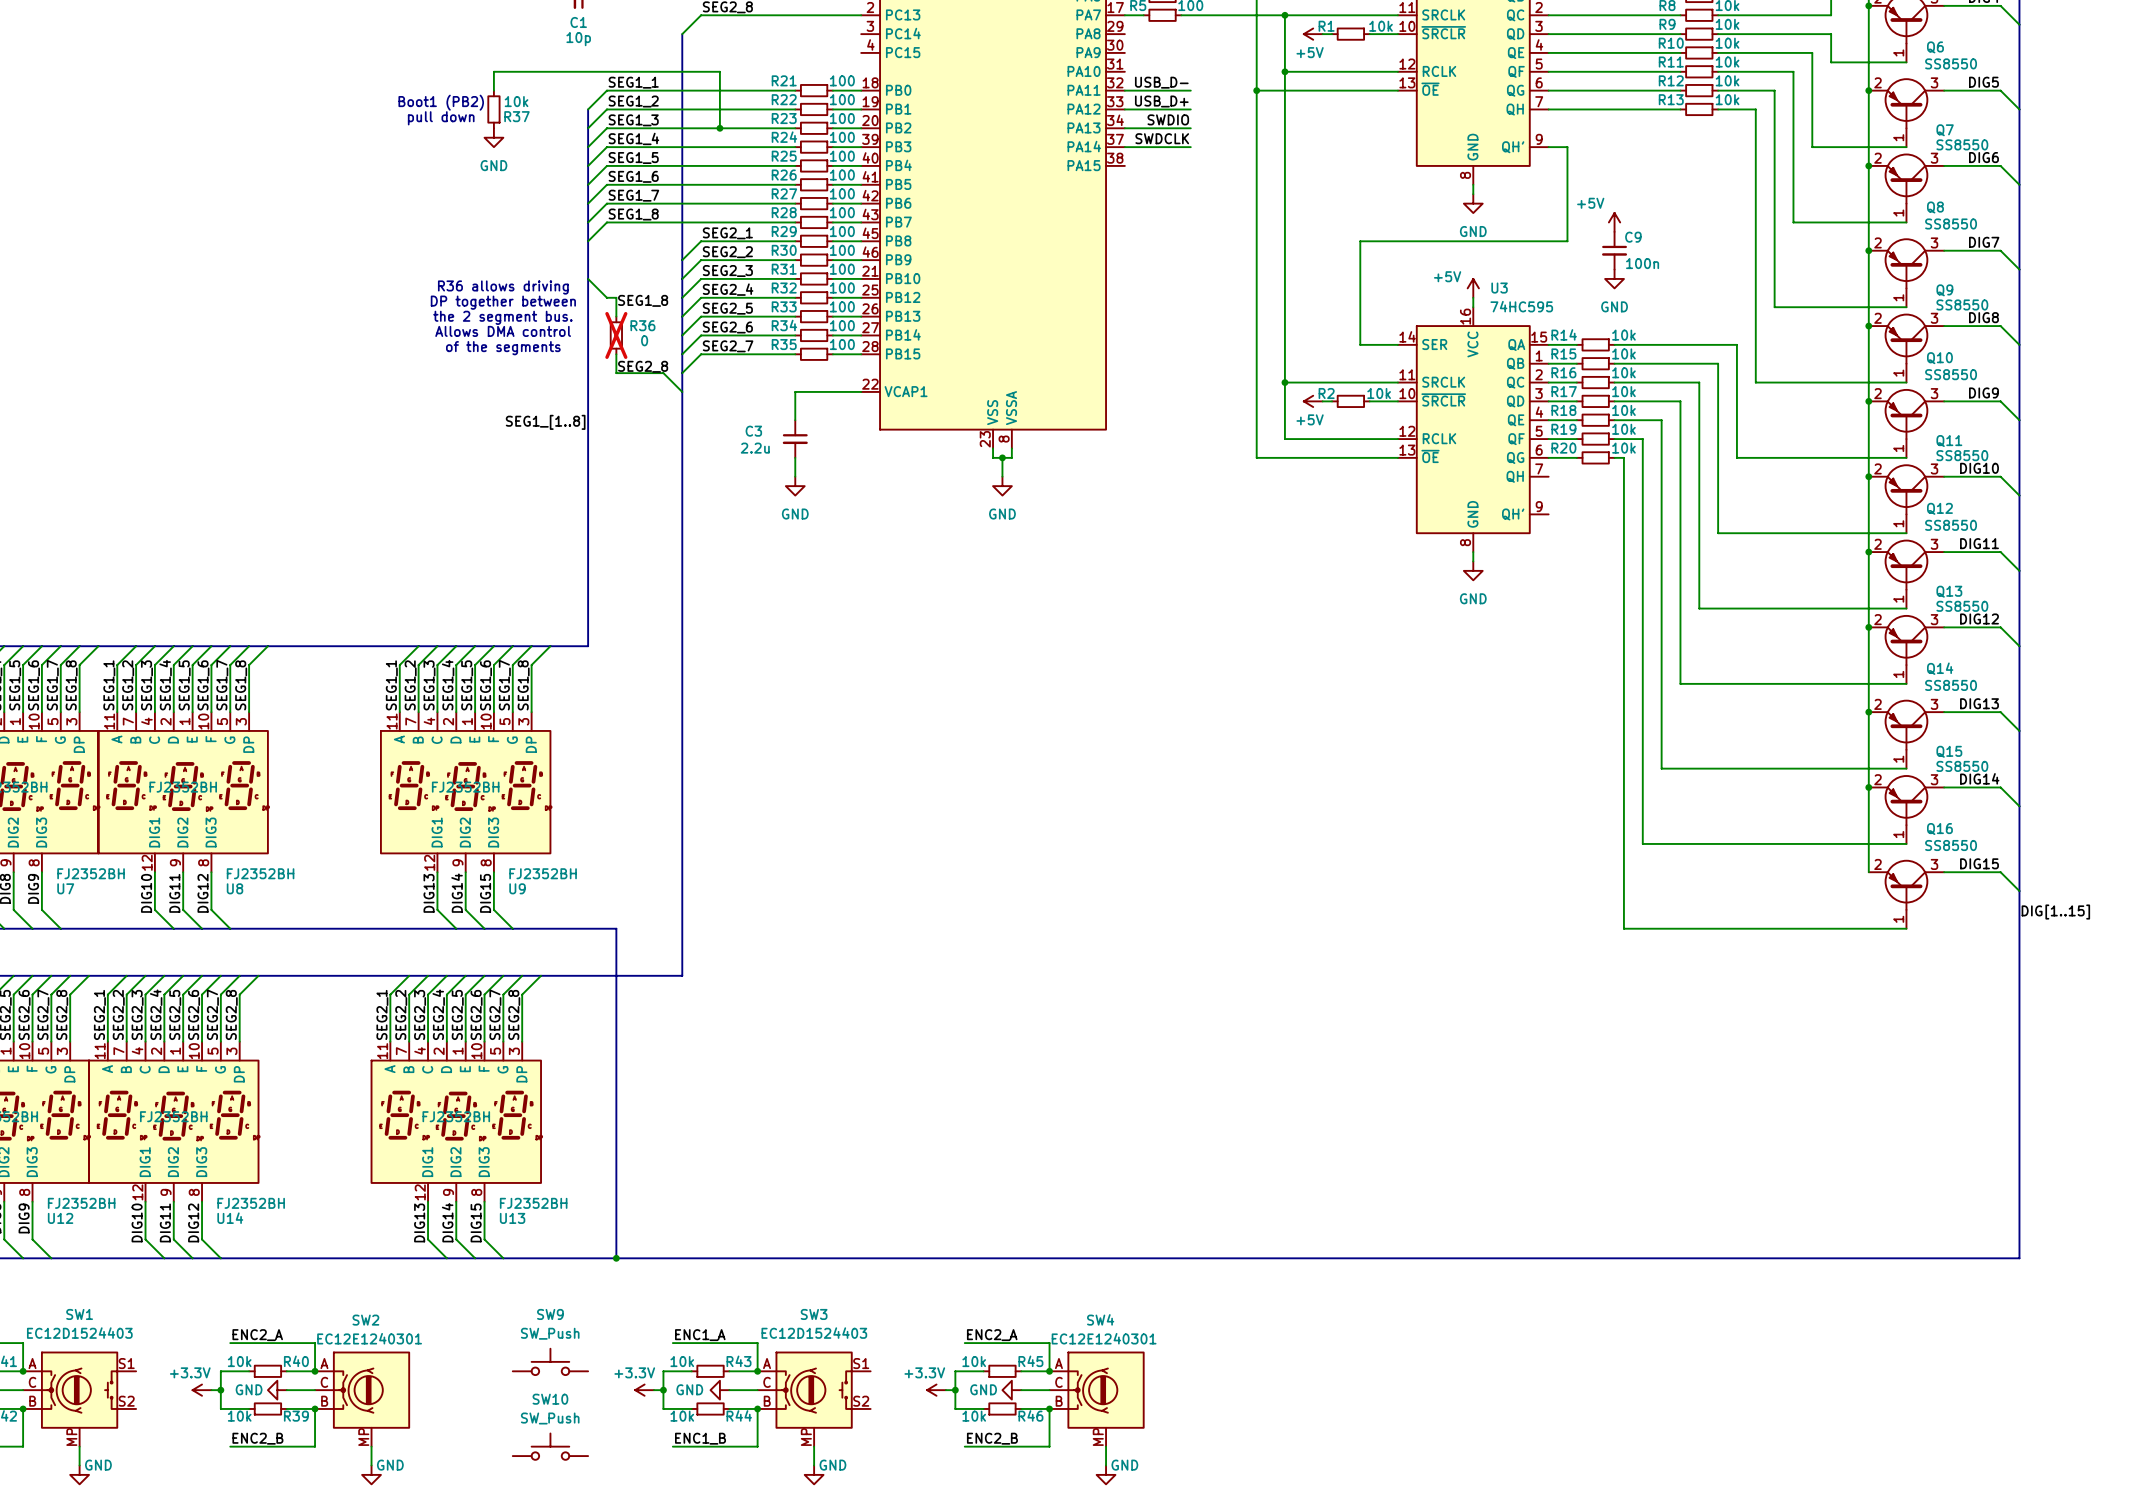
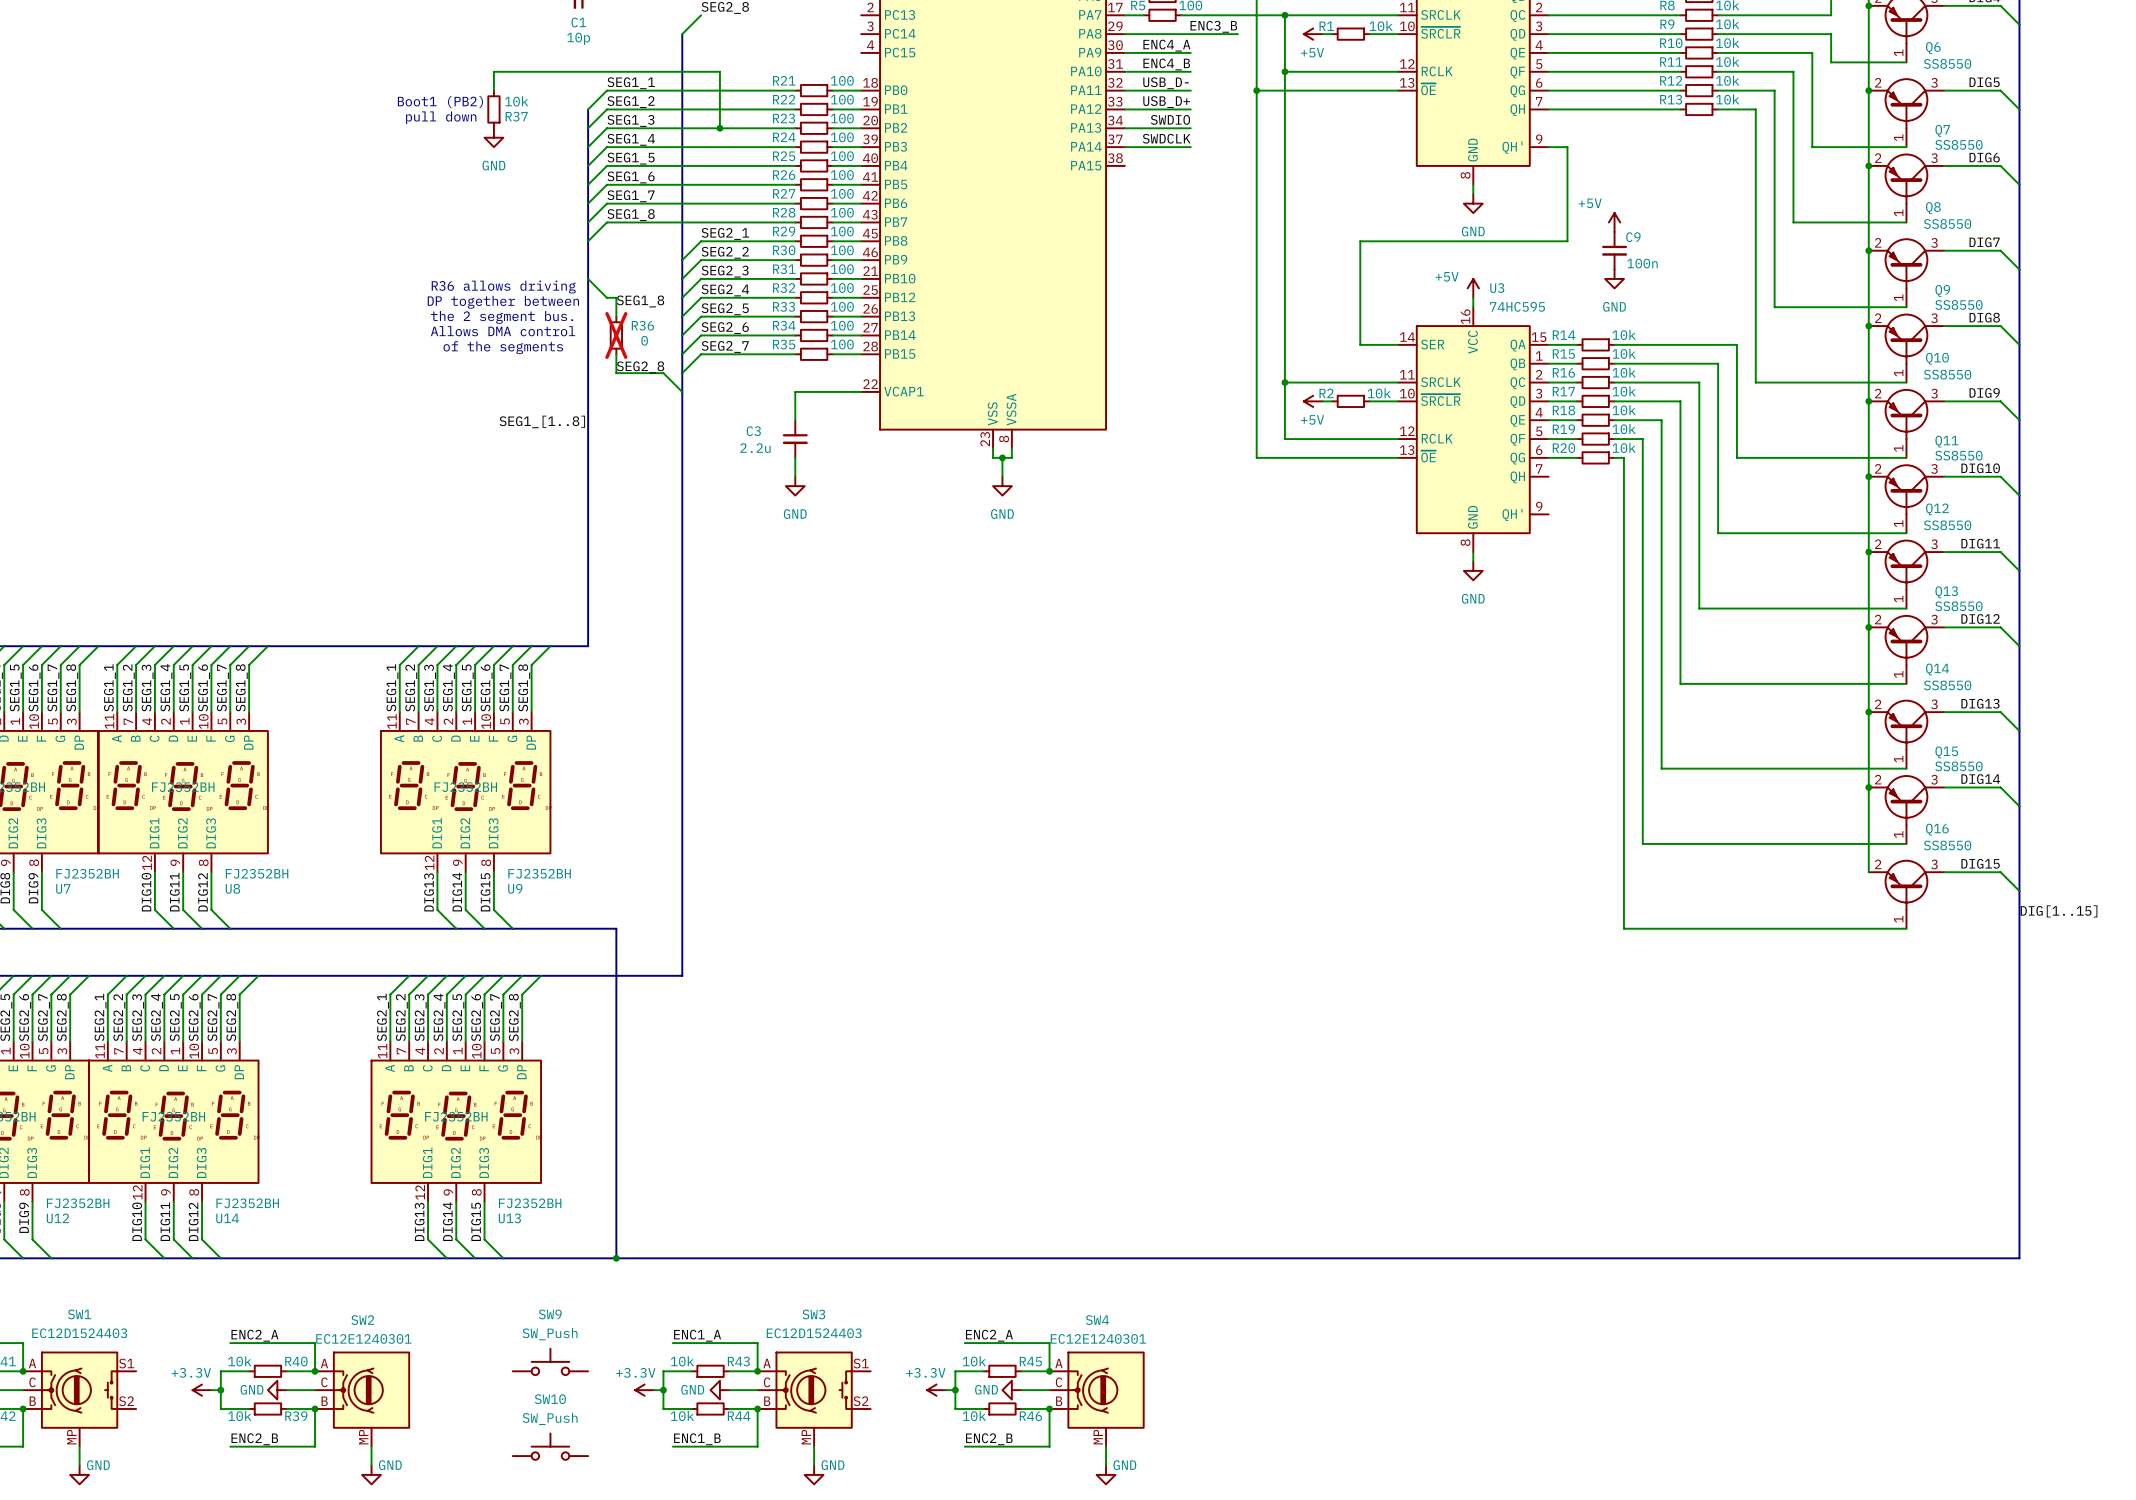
wire: (701, 15) (861, 15) -> none
label: none -> ENC3_B (1213, 26)
wire: none -> (1124, 34) (1237, 34)
label: none -> ENC4_A (1166, 45)
wire: none -> (1124, 52) (1190, 52)
label: none -> ENC4_B (1166, 64)
wire: none -> (1124, 71) (1190, 71)

